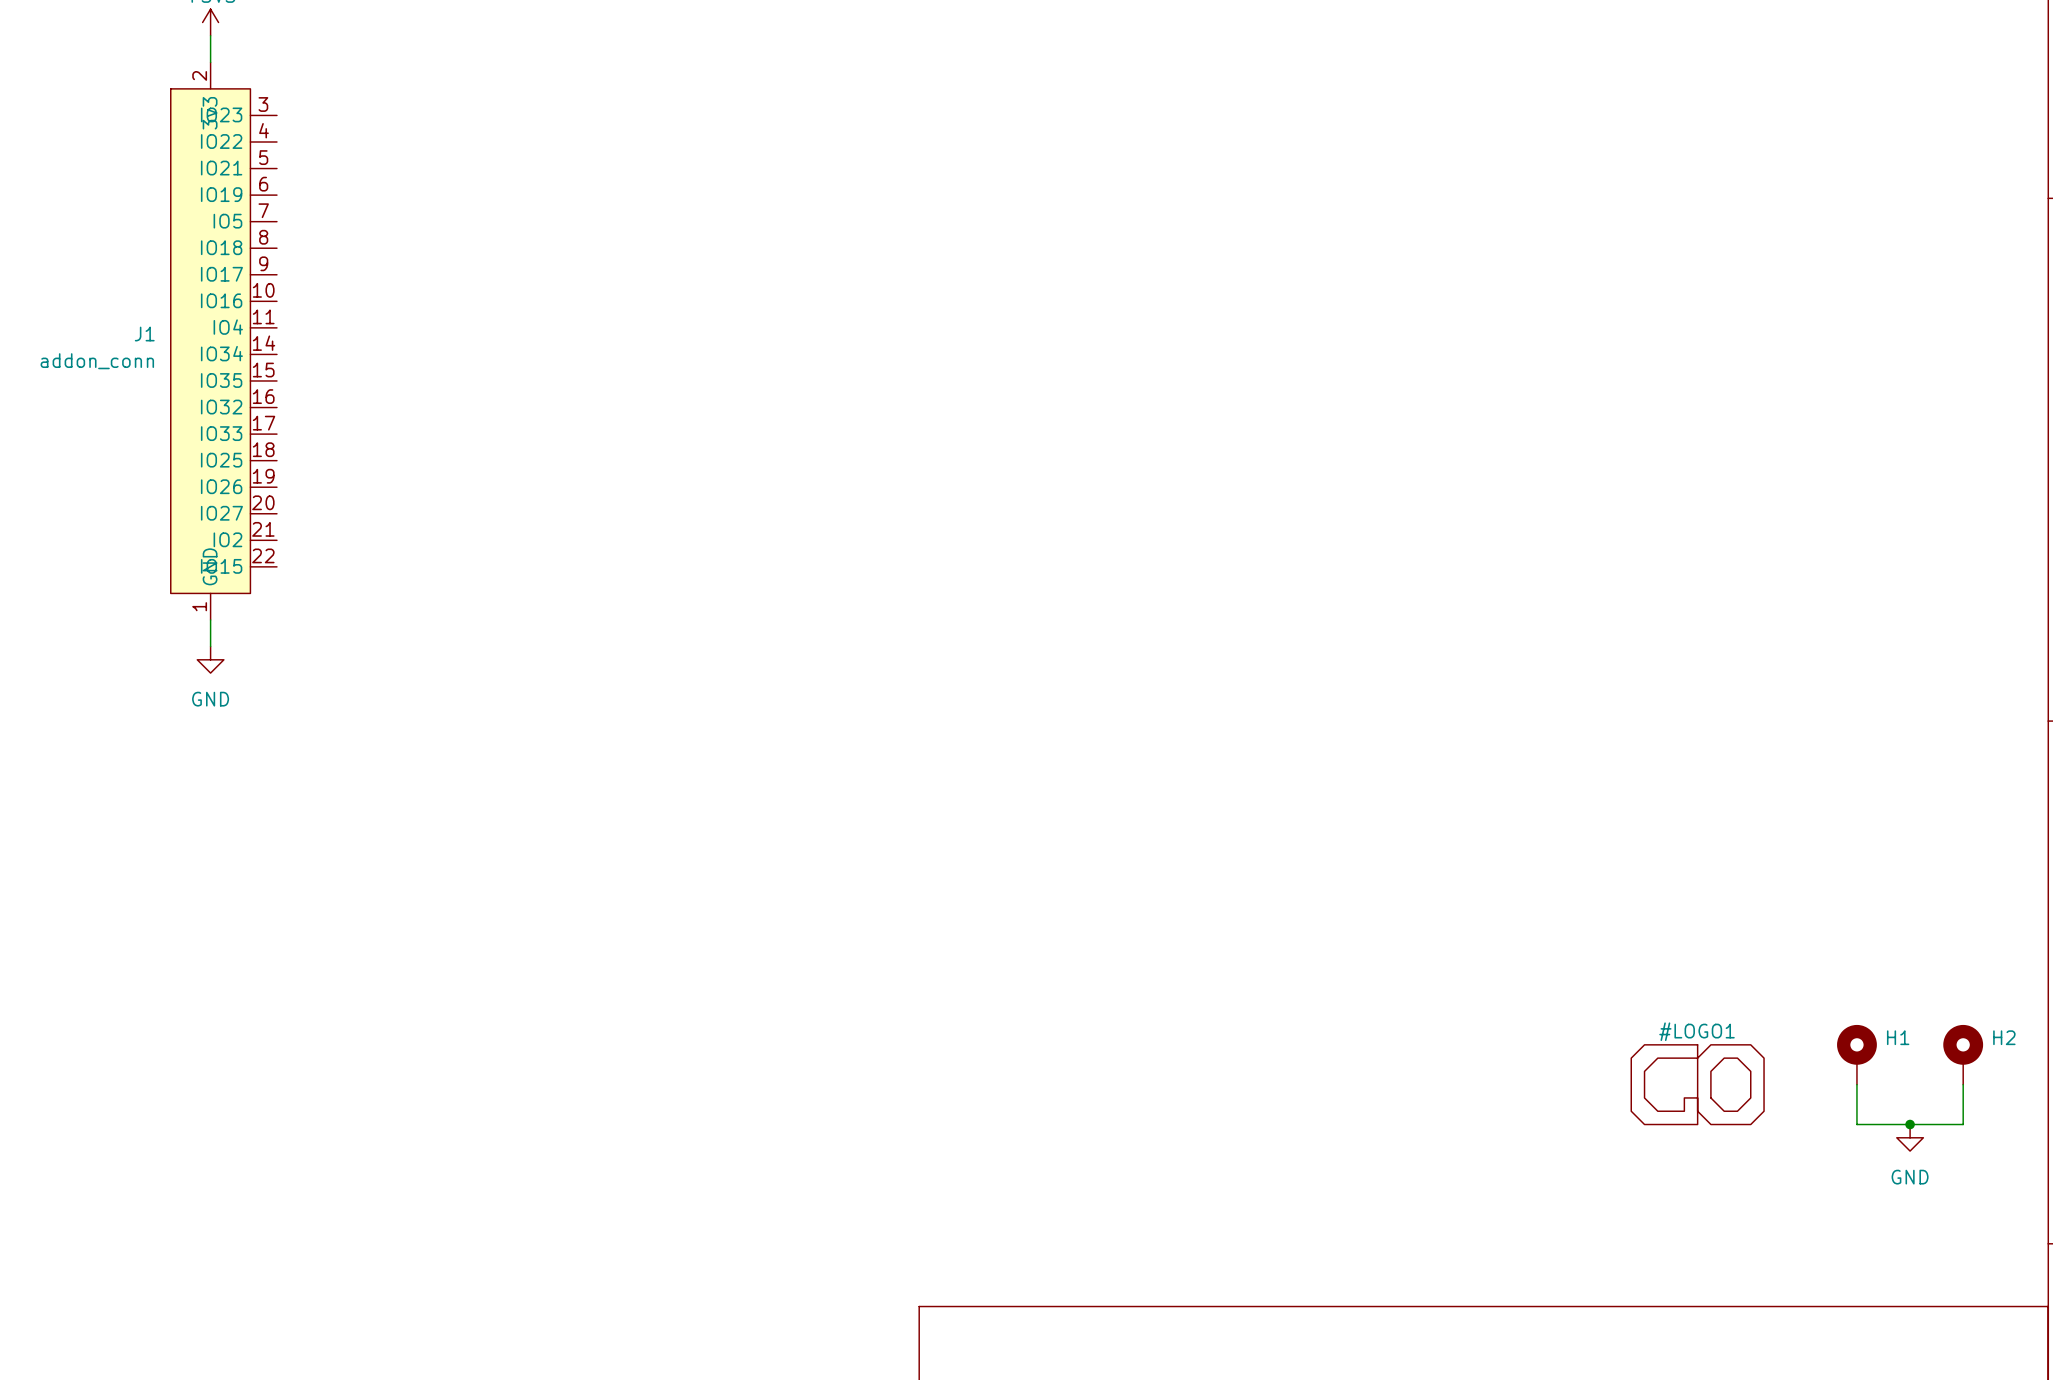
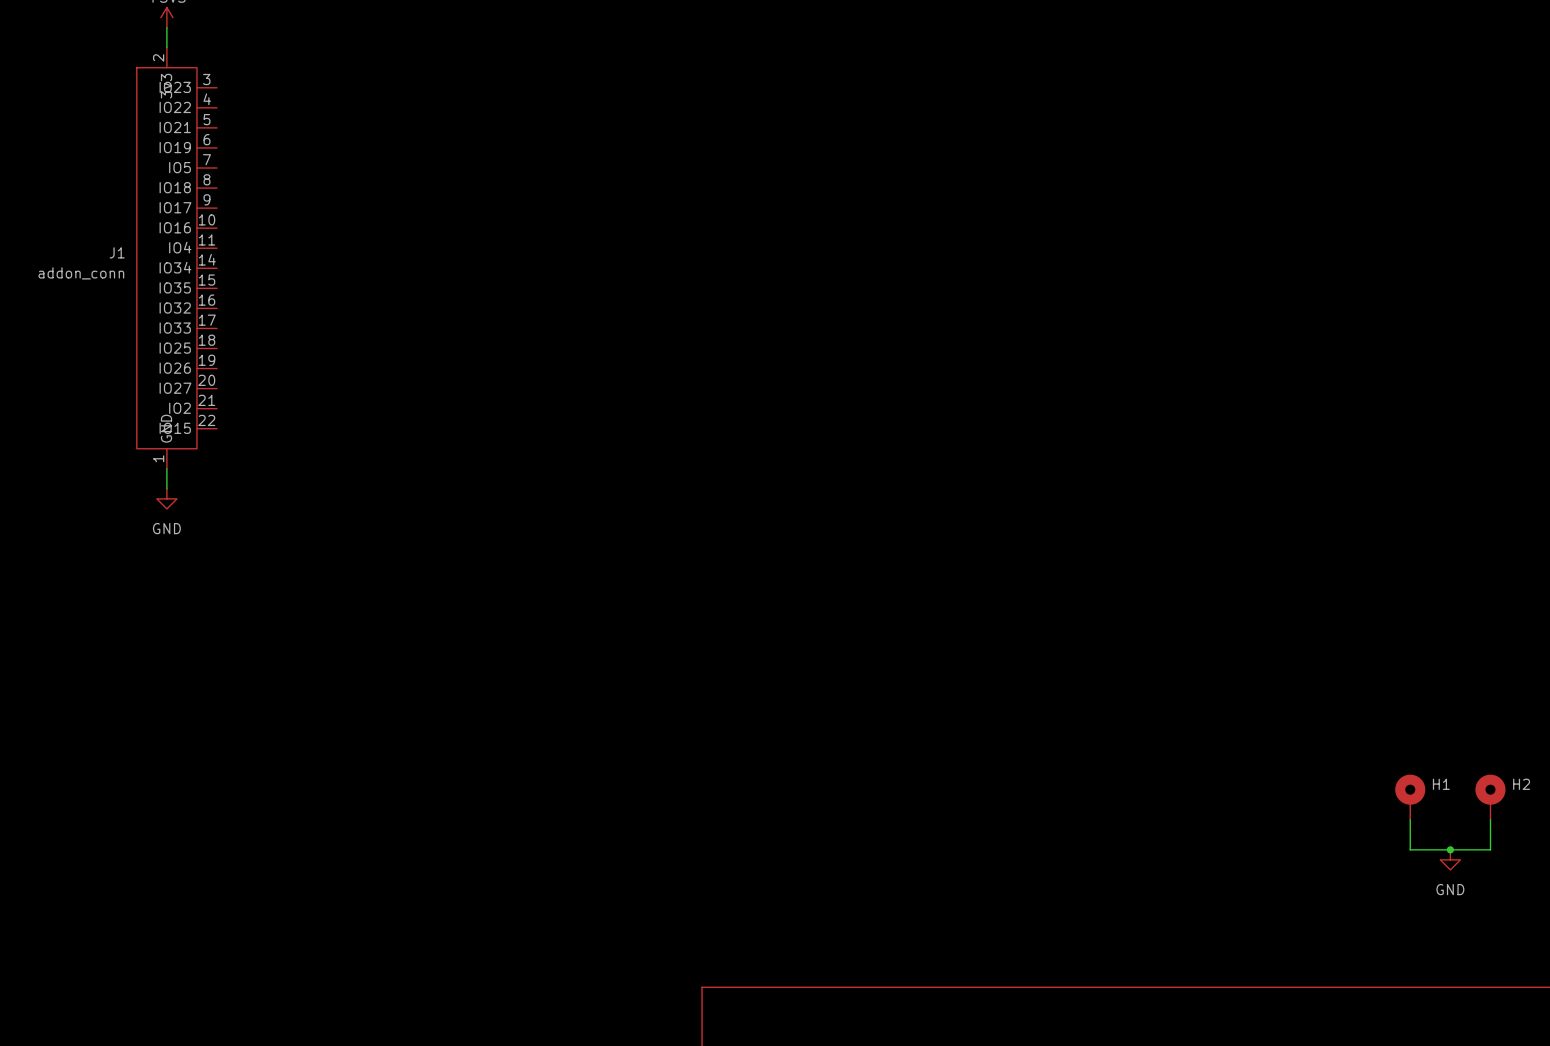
#LOGO1: (1697, 1084) -> none

